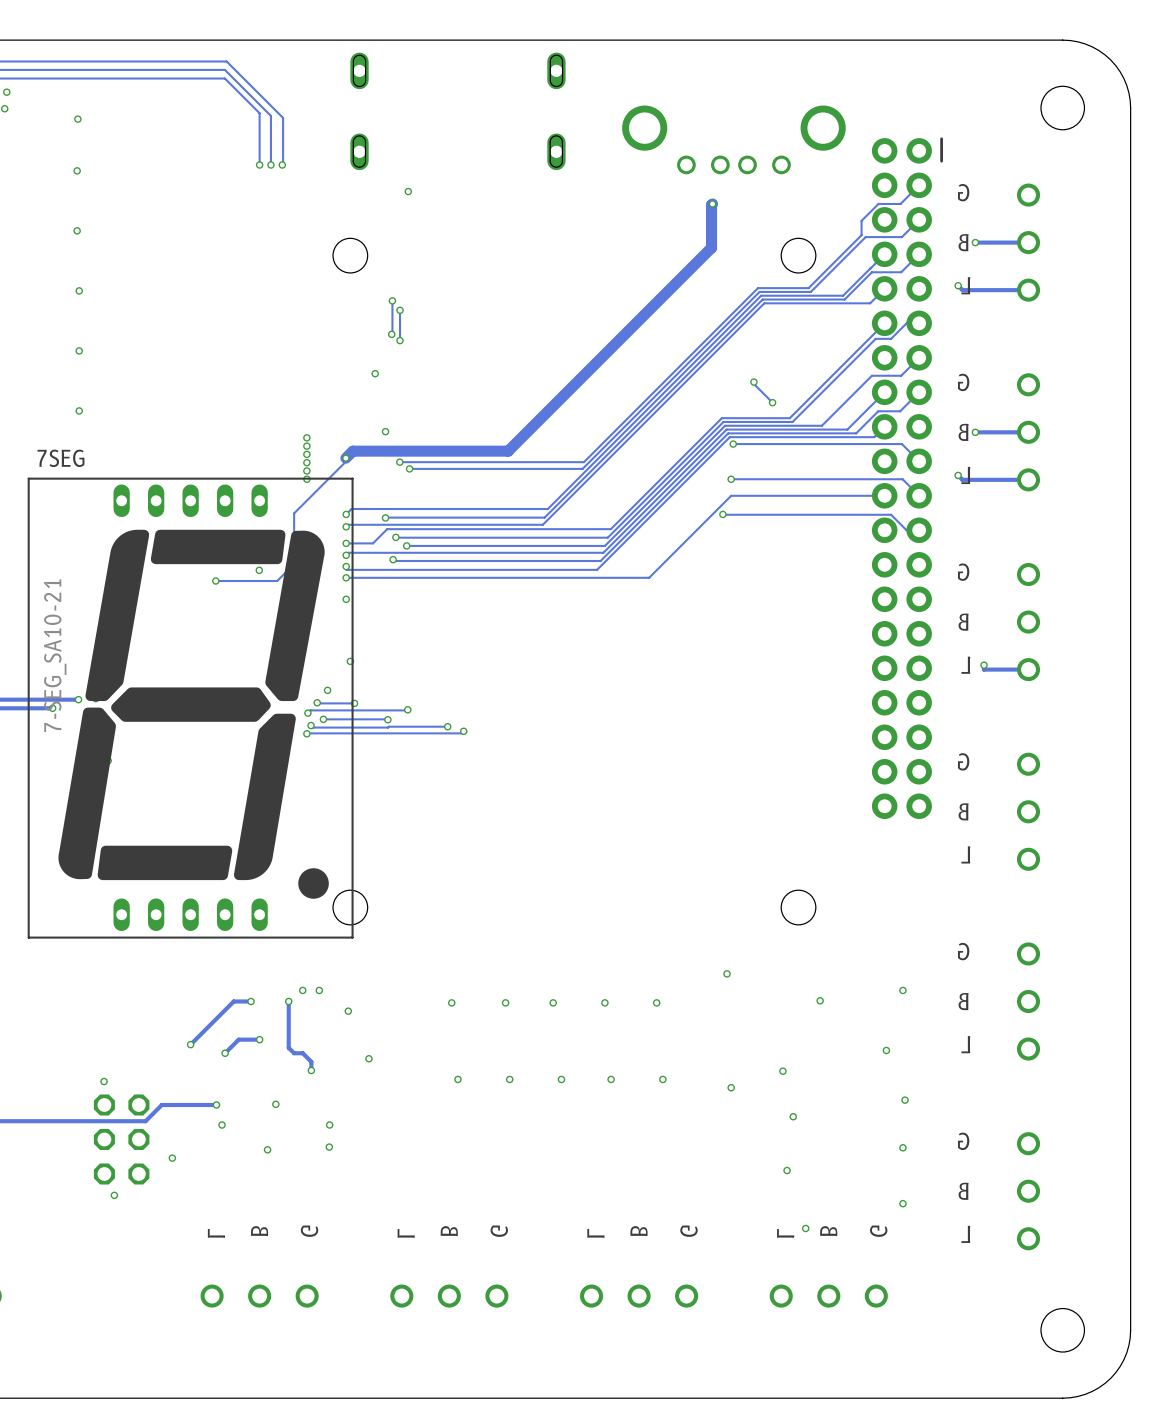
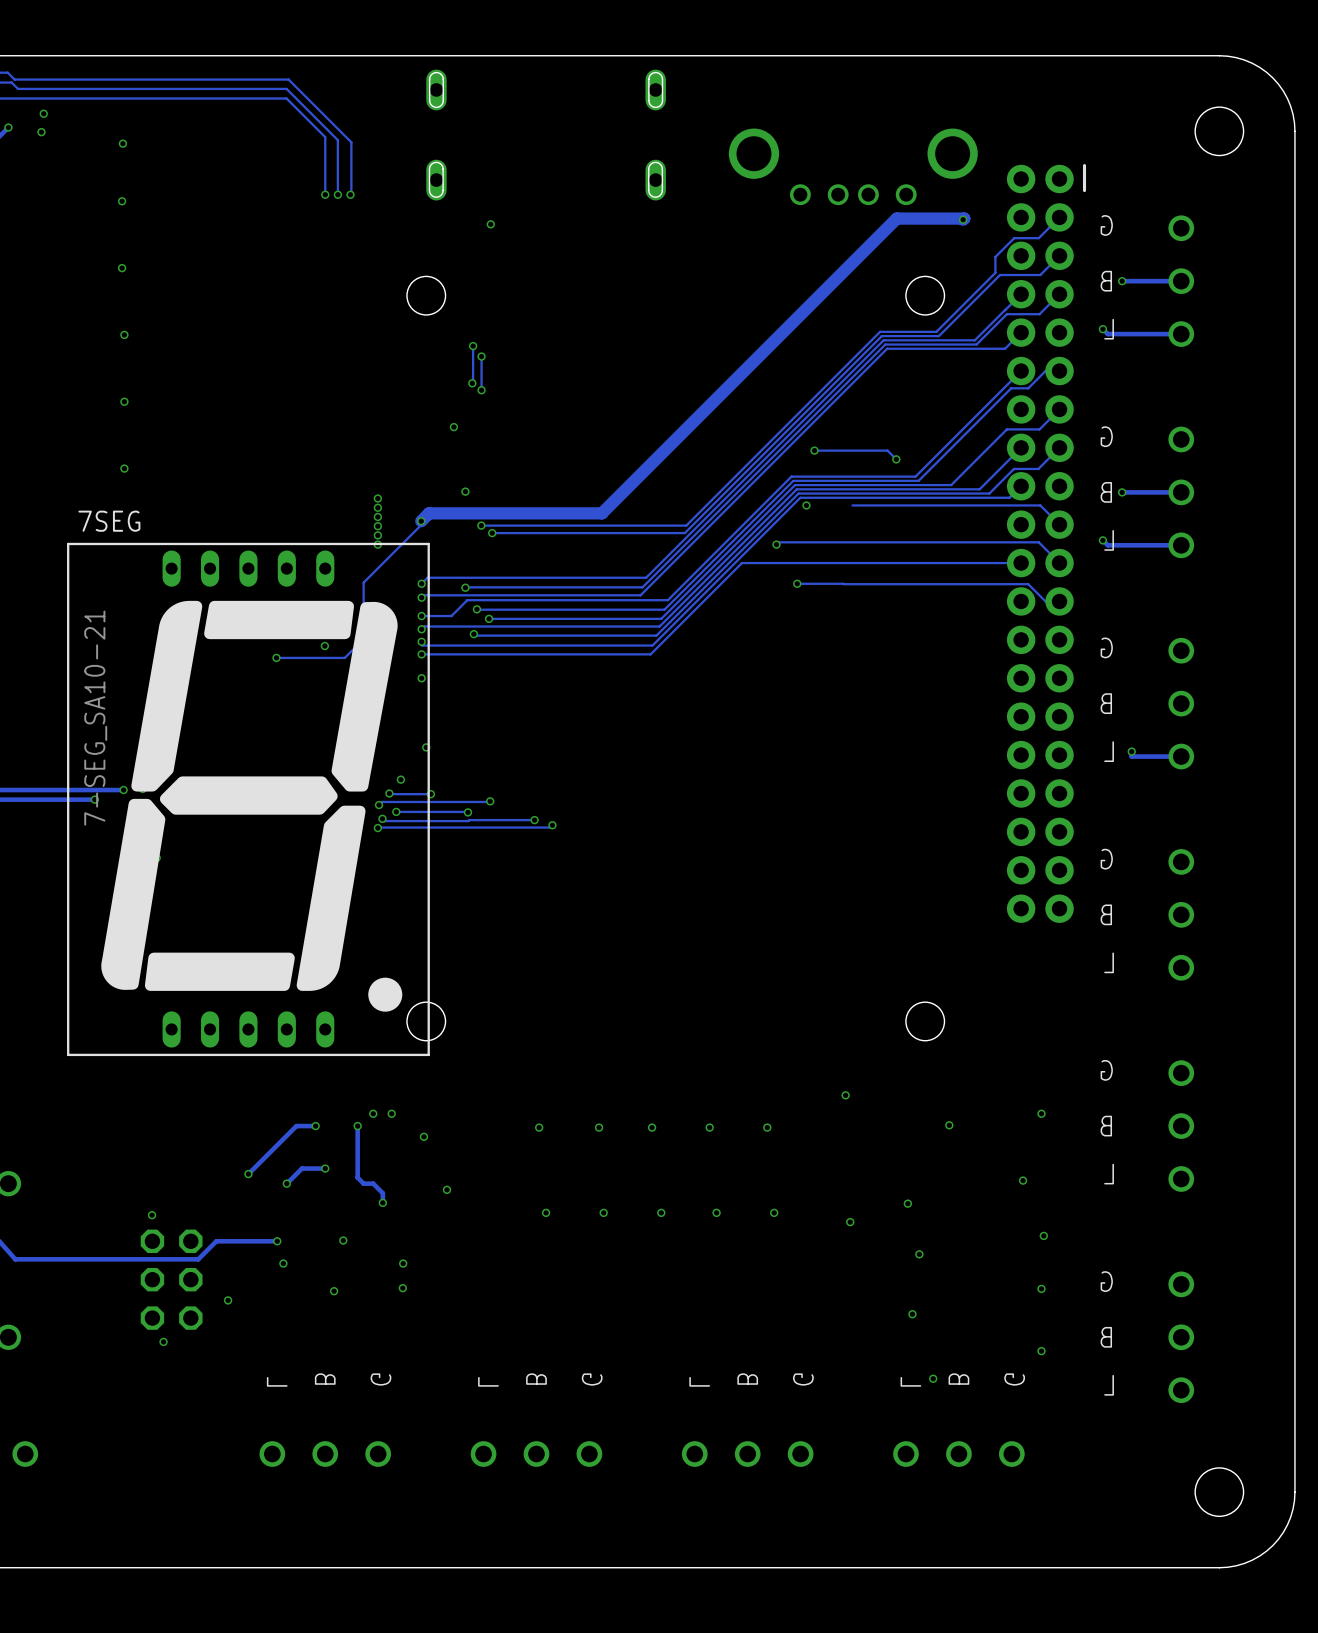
via: none -> (963, 219)
track: (712, 203) (711, 247) -> (963, 219) (964, 218) (896, 218) (828, 286)
via: (712, 203) -> none
track: (753, 382) (764, 394) -> (814, 450) (887, 450)
via: (753, 382) -> none
via: none -> (814, 450)
track: (721, 418) (610, 529) (567, 529) -> (839, 476) (791, 476) (667, 600)
track: (723, 421) (607, 537) (564, 537) -> (841, 480) (793, 480) (664, 609)
track: (725, 425) (604, 545) (561, 545) -> (843, 485) (795, 485) (661, 618)
track: (726, 429) (603, 552) (559, 552) -> (845, 489) (796, 489) (659, 626)
track: (728, 433) (600, 560) (557, 560) -> (846, 493) (798, 493) (656, 635)
track: (729, 437) (597, 569) (553, 569) -> (848, 497) (800, 497) (652, 645)
via: none -> (806, 505)
via: (733, 444) -> none
via: none -> (776, 544)
via: (731, 479) -> none
track: (902, 479) (731, 479) -> (1041, 544) (1038, 542) (776, 542) (776, 544)
track: (731, 495) (649, 577) (551, 577) -> (850, 563) (741, 563) (650, 654)
via: none -> (797, 583)
track: none -> (841, 583) (797, 583)
via: (722, 514) -> none

